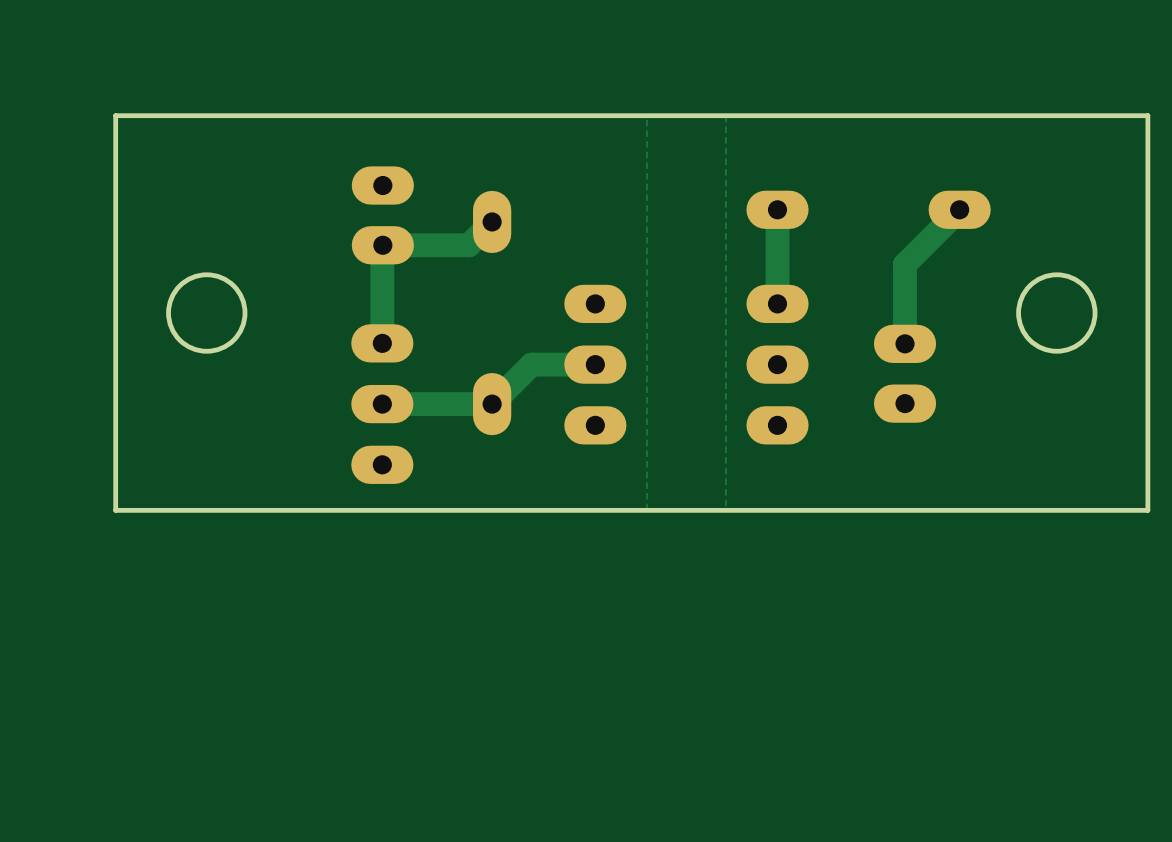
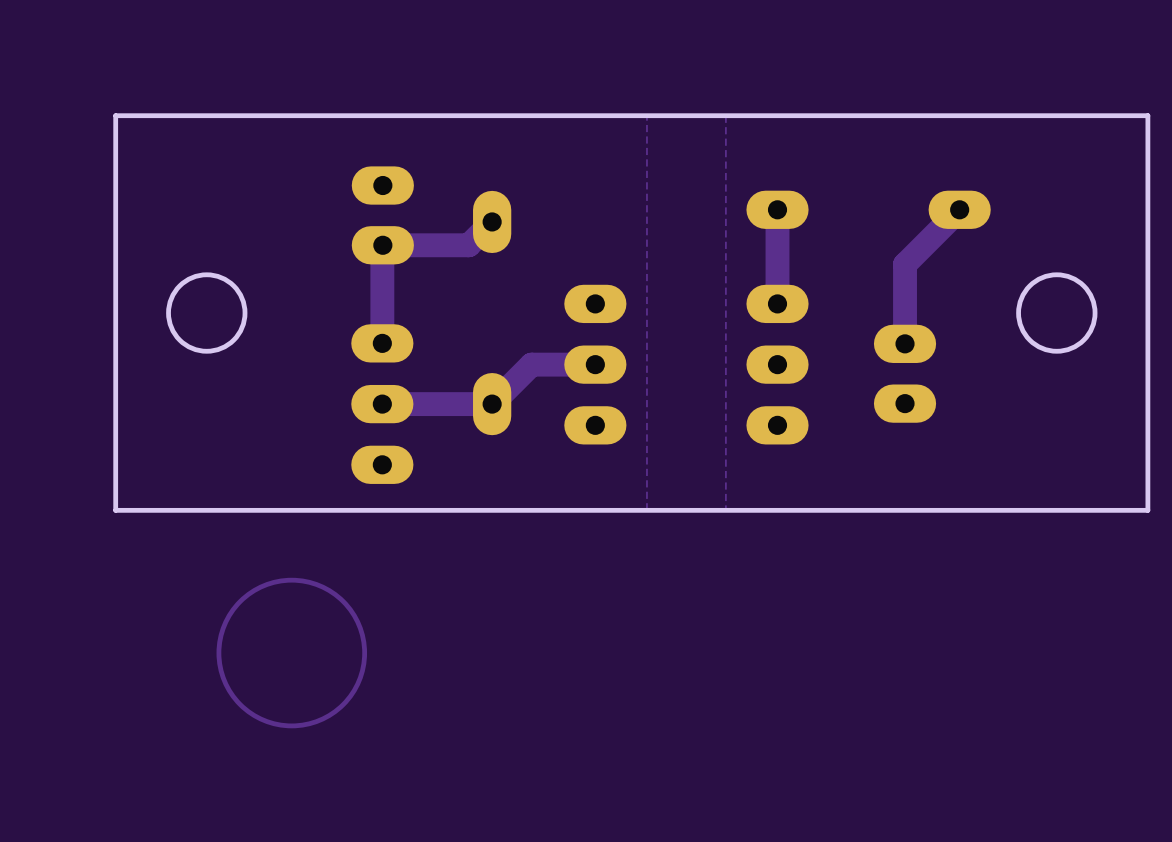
drawing: none -> [216, 577, 368, 729]

